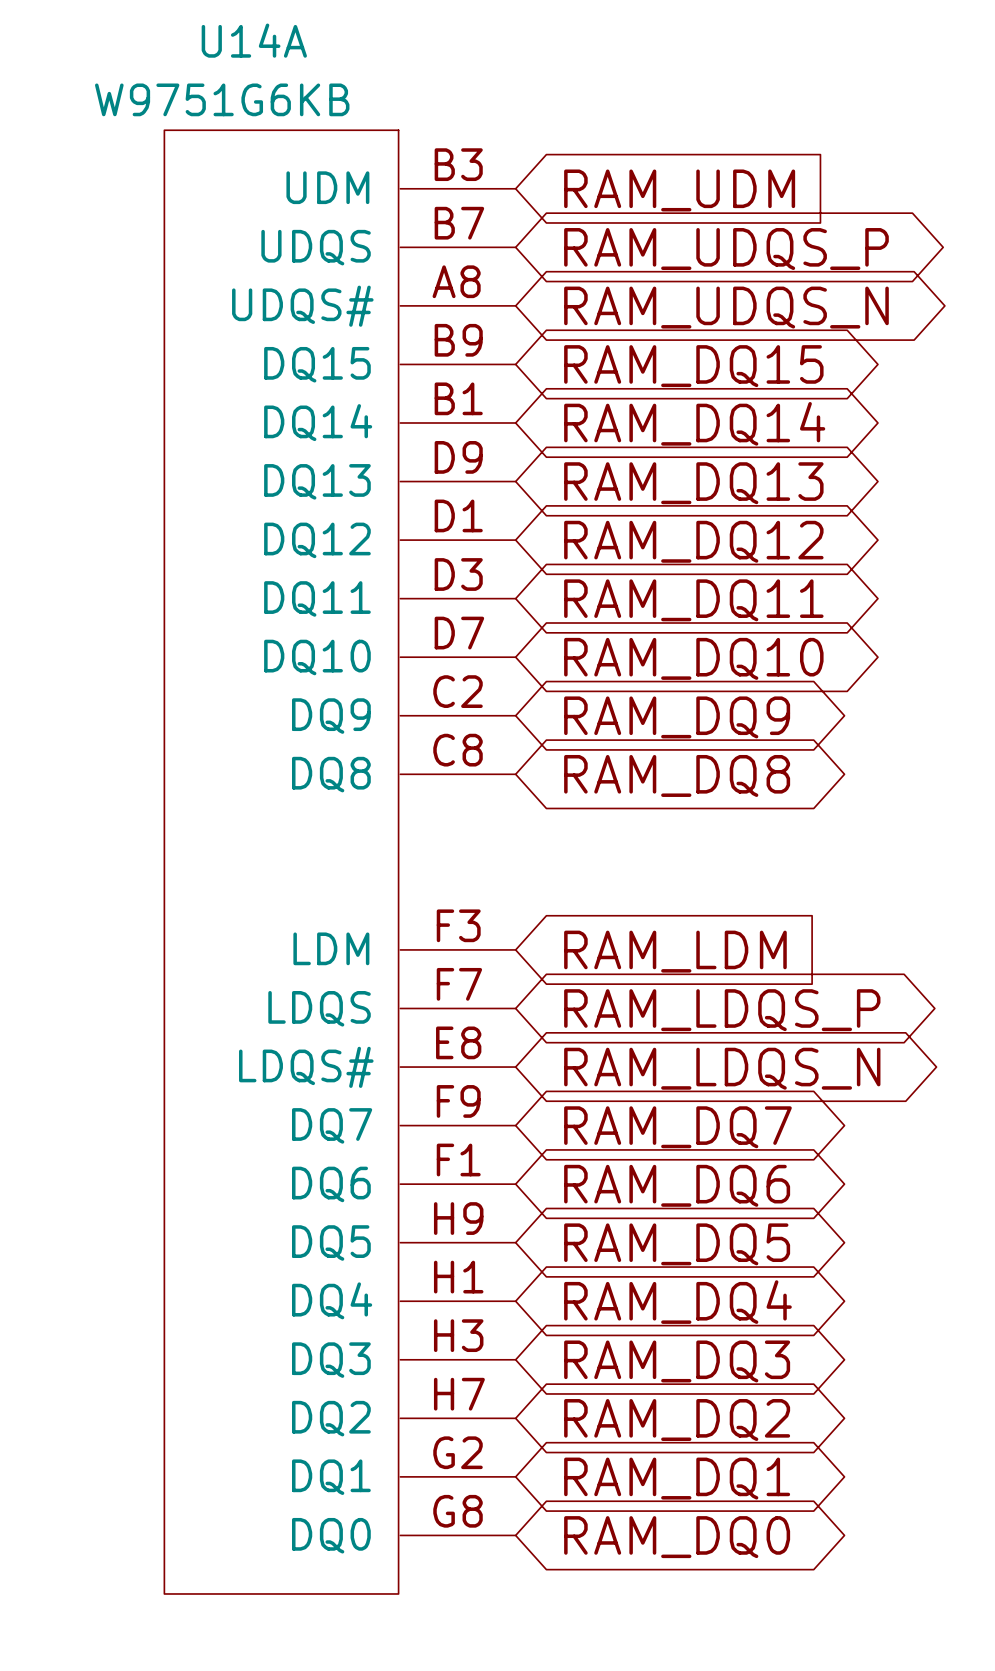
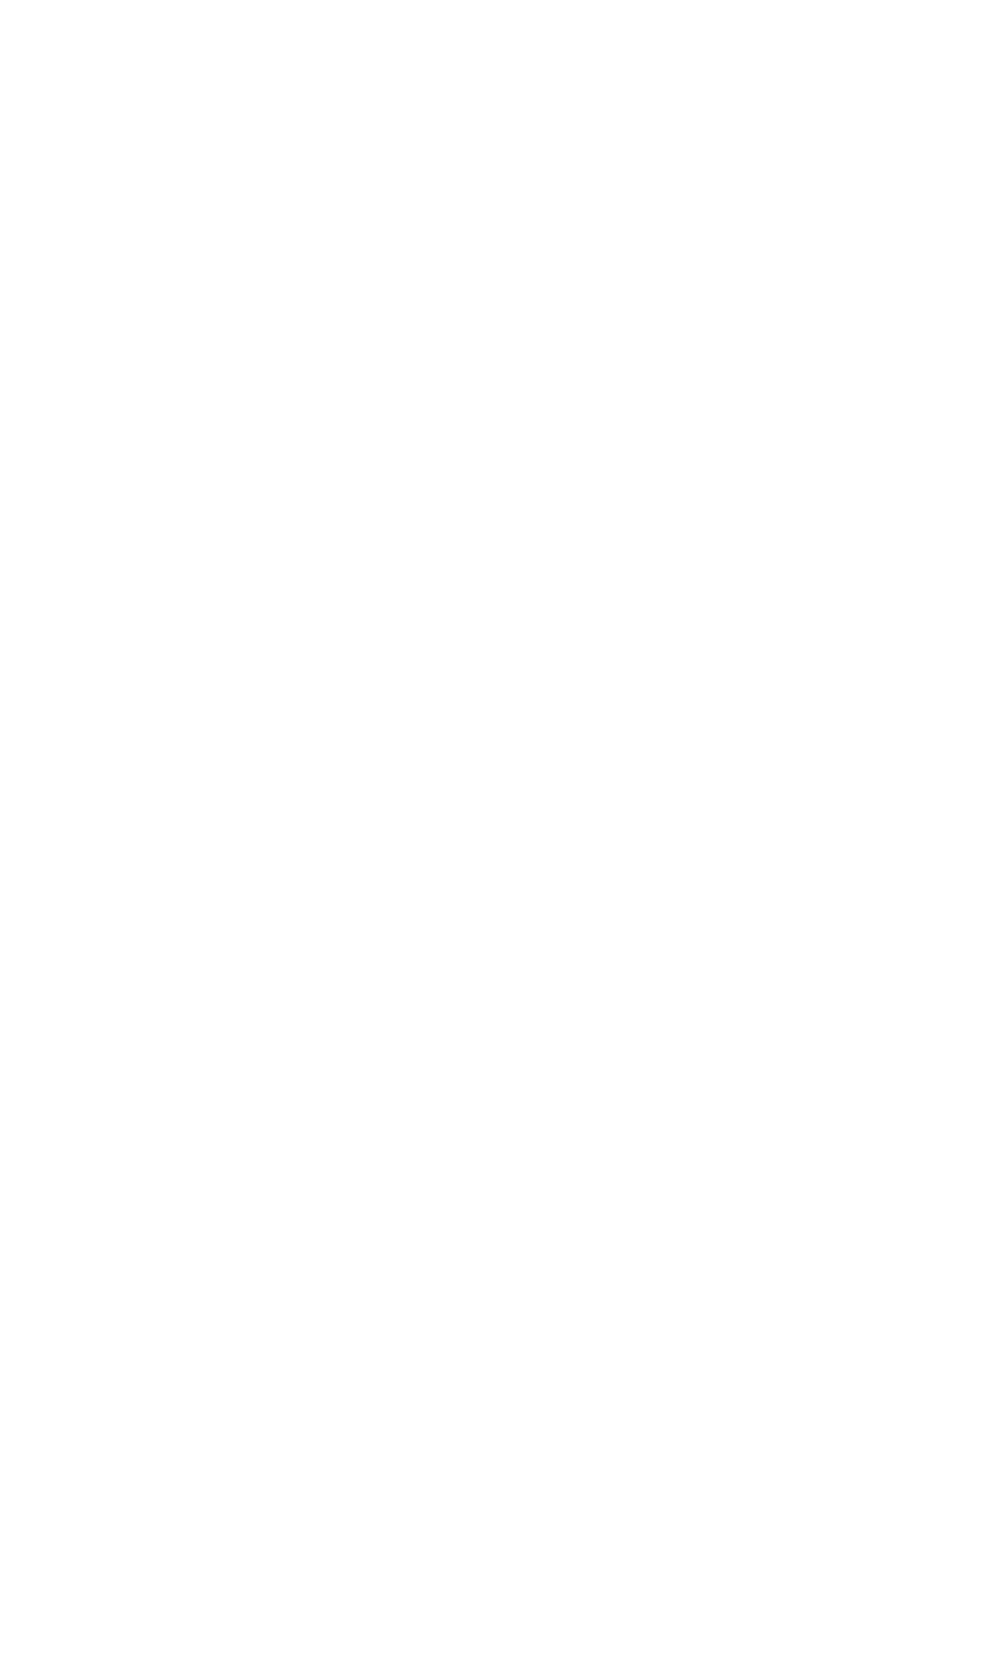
global label: RAM_UDM (679, 190) -> none
global label: RAM_UDQS_P (726, 249) -> none
global label: RAM_UDQS_N (726, 307) -> none
global label: RAM_DQ15 (693, 366) -> none
global label: RAM_DQ14 (694, 423) -> none
global label: RAM_DQ13 (693, 483) -> none
global label: RAM_DQ12 (693, 541) -> none
global label: RAM_DQ11 (693, 600) -> none
global label: RAM_DQ10 (693, 658) -> none
global label: RAM_DQ9 (677, 717) -> none
global label: RAM_DQ8 (677, 775) -> none
U14A: W9751G6KB (340, 862) -> none
global label: RAM_LDM (675, 951) -> none
global label: RAM_LDQS_P (722, 1010) -> none
global label: RAM_LDQS_N (722, 1068) -> none
global label: RAM_DQ7 (677, 1127) -> none
global label: RAM_DQ6 (677, 1185) -> none
global label: RAM_DQ5 (677, 1244) -> none
global label: RAM_DQ4 (677, 1302) -> none
global label: RAM_DQ3 (677, 1361) -> none
global label: RAM_DQ2 (677, 1420) -> none
global label: RAM_DQ1 (677, 1478) -> none
global label: RAM_DQ0 (677, 1537) -> none

